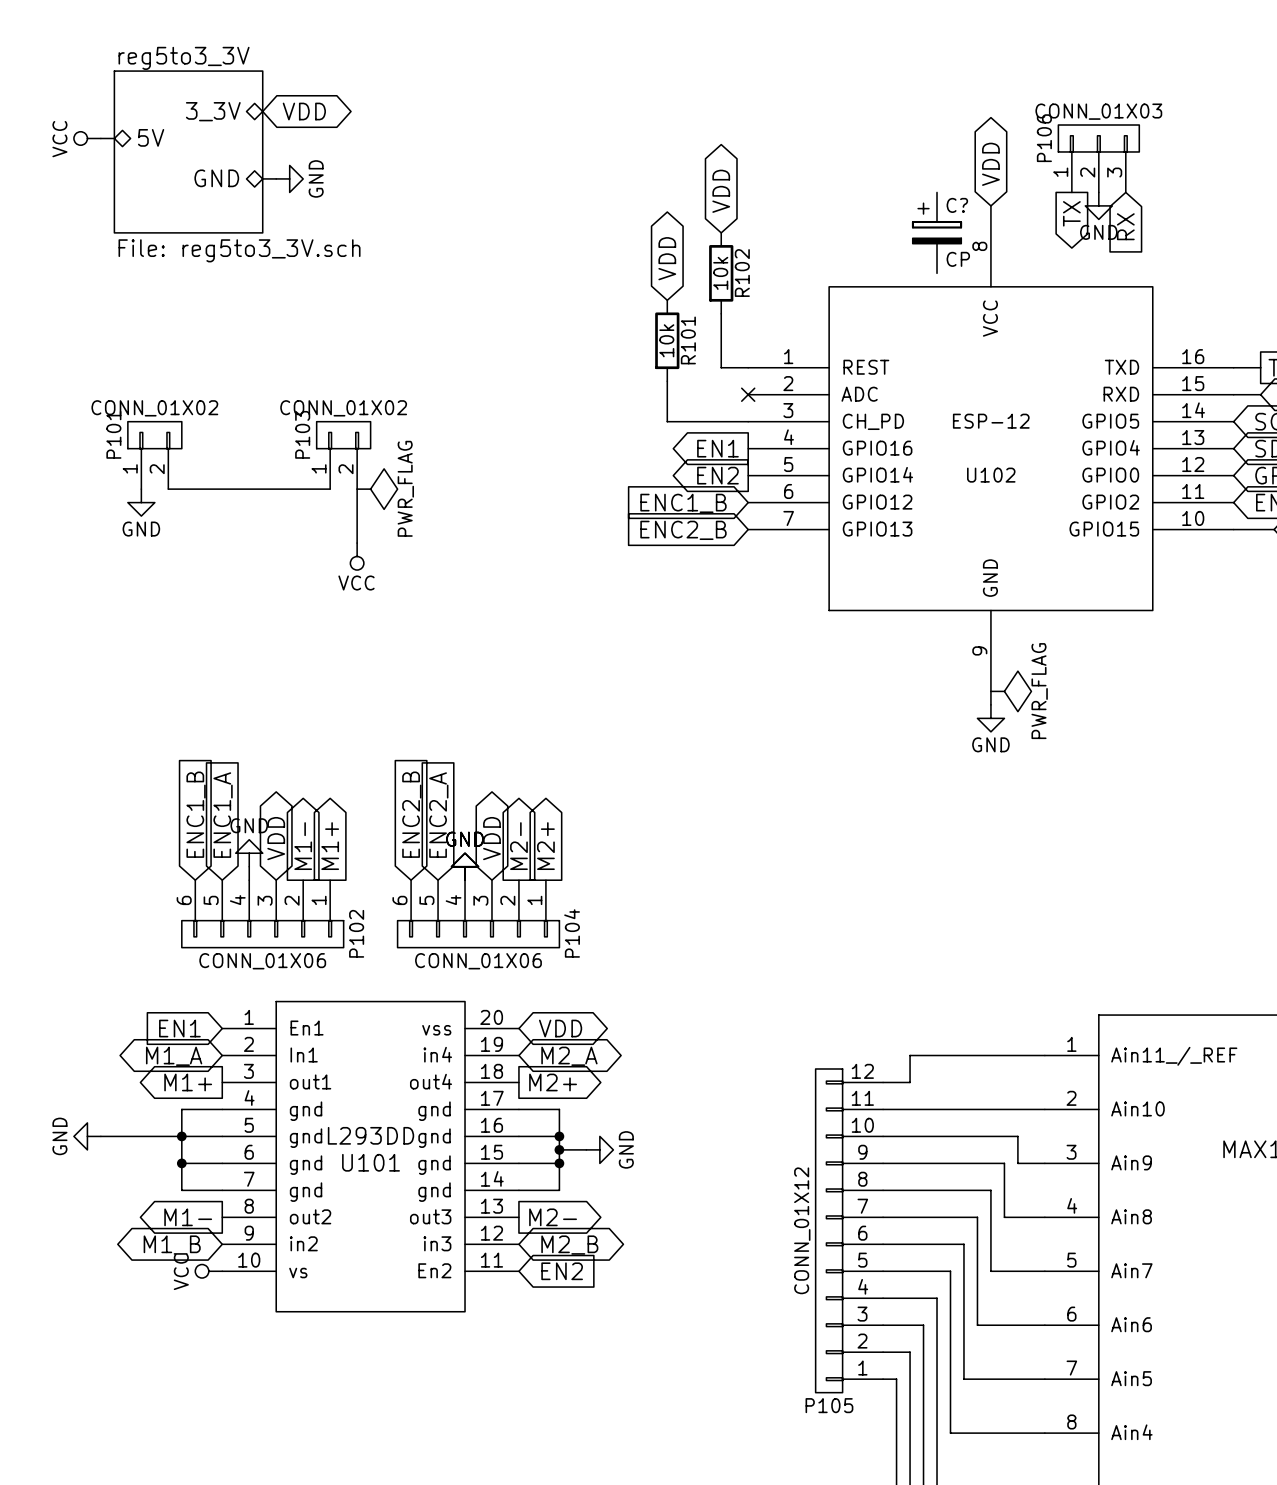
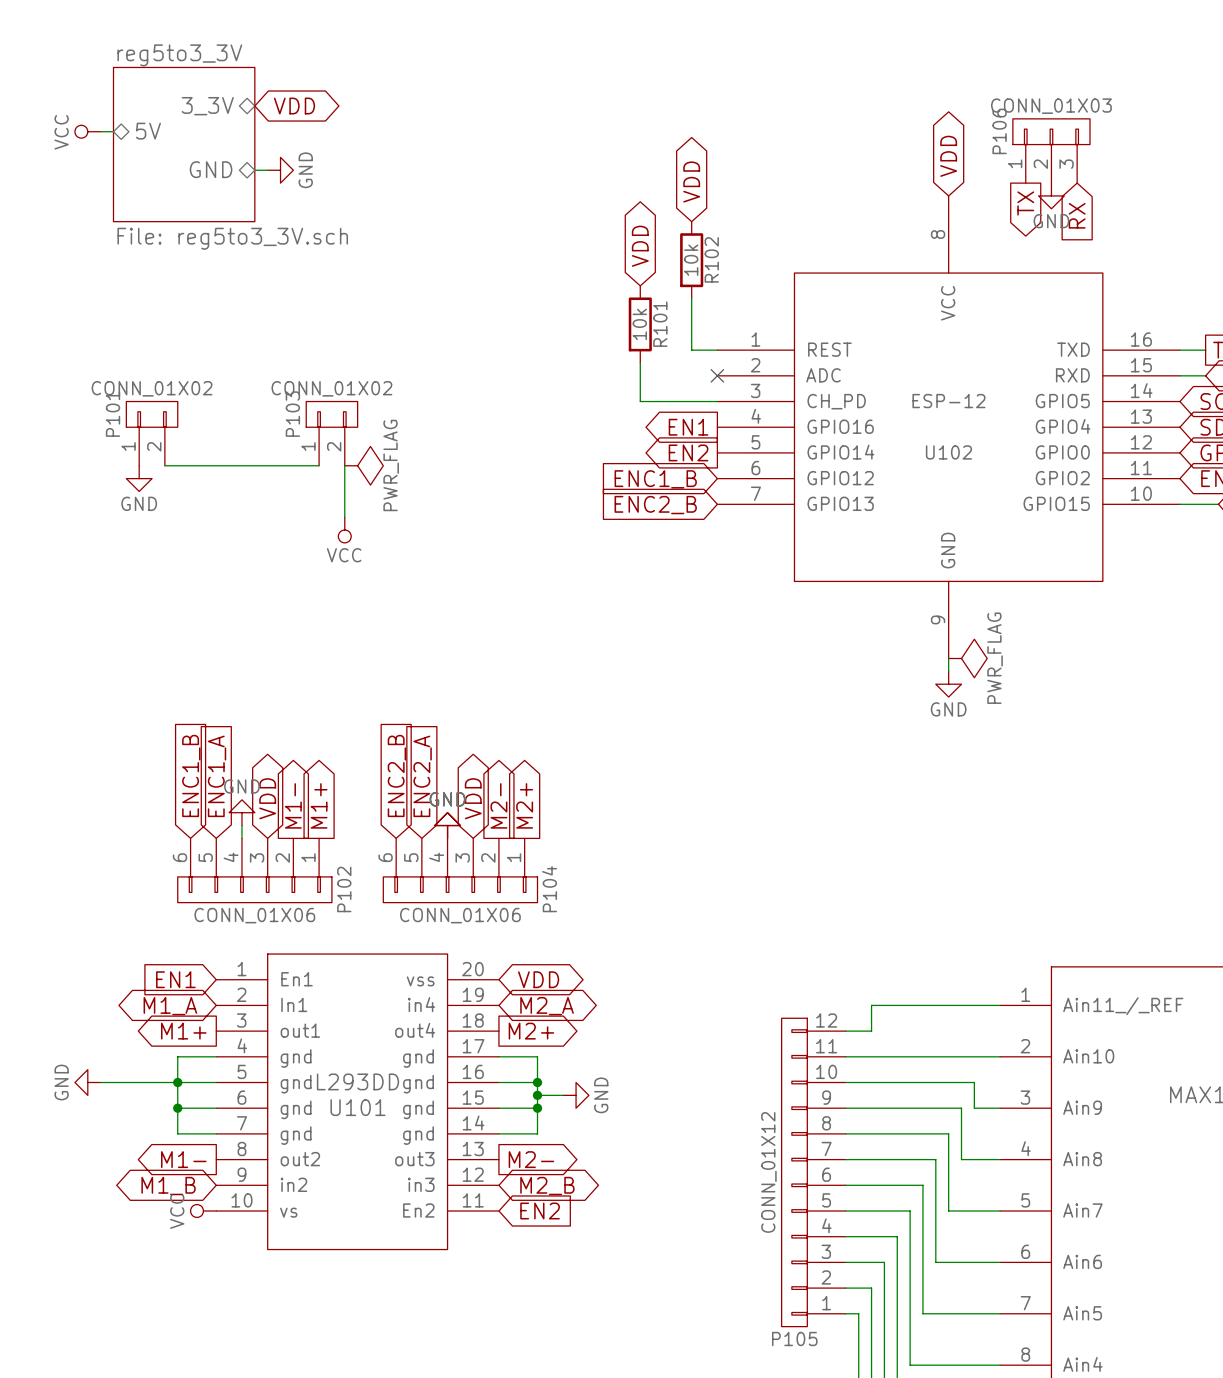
C?: CP (937, 232) -> none

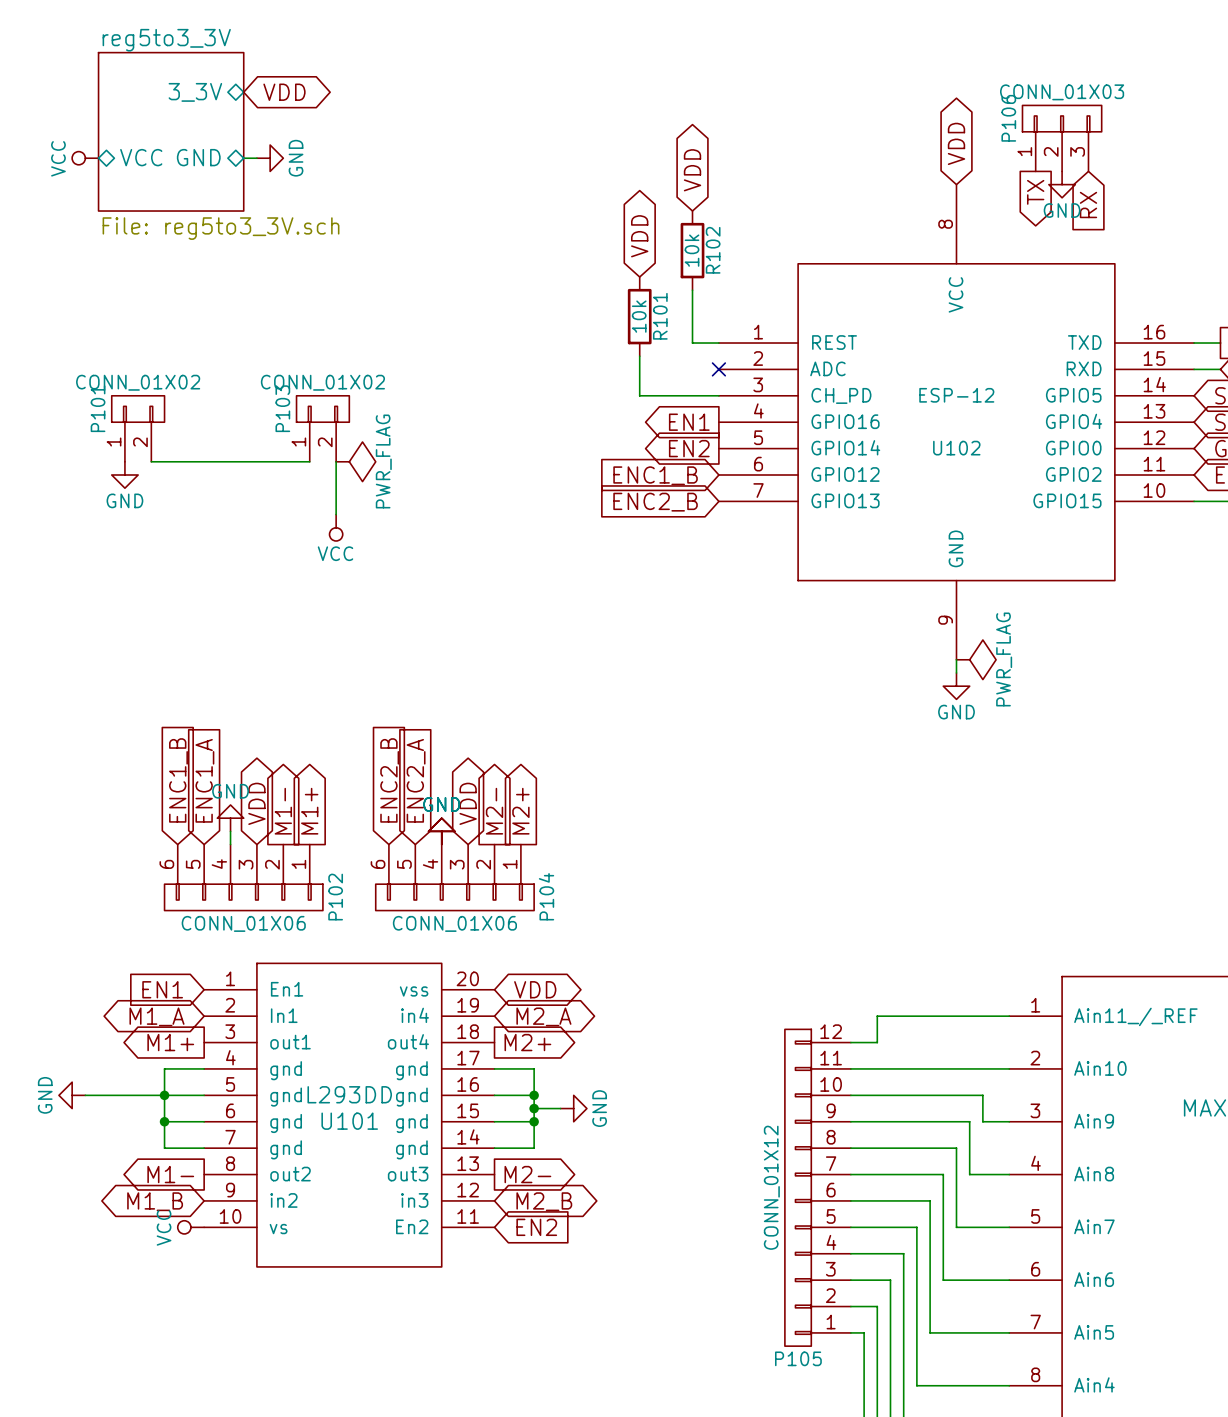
power symbol position: VCC (87, 131) -> VCC (85, 158)
wire: (100, 131) (113, 131) -> none
sheet pin: 5V (148, 131) -> none
sheet pin: none -> VCC (141, 157)

